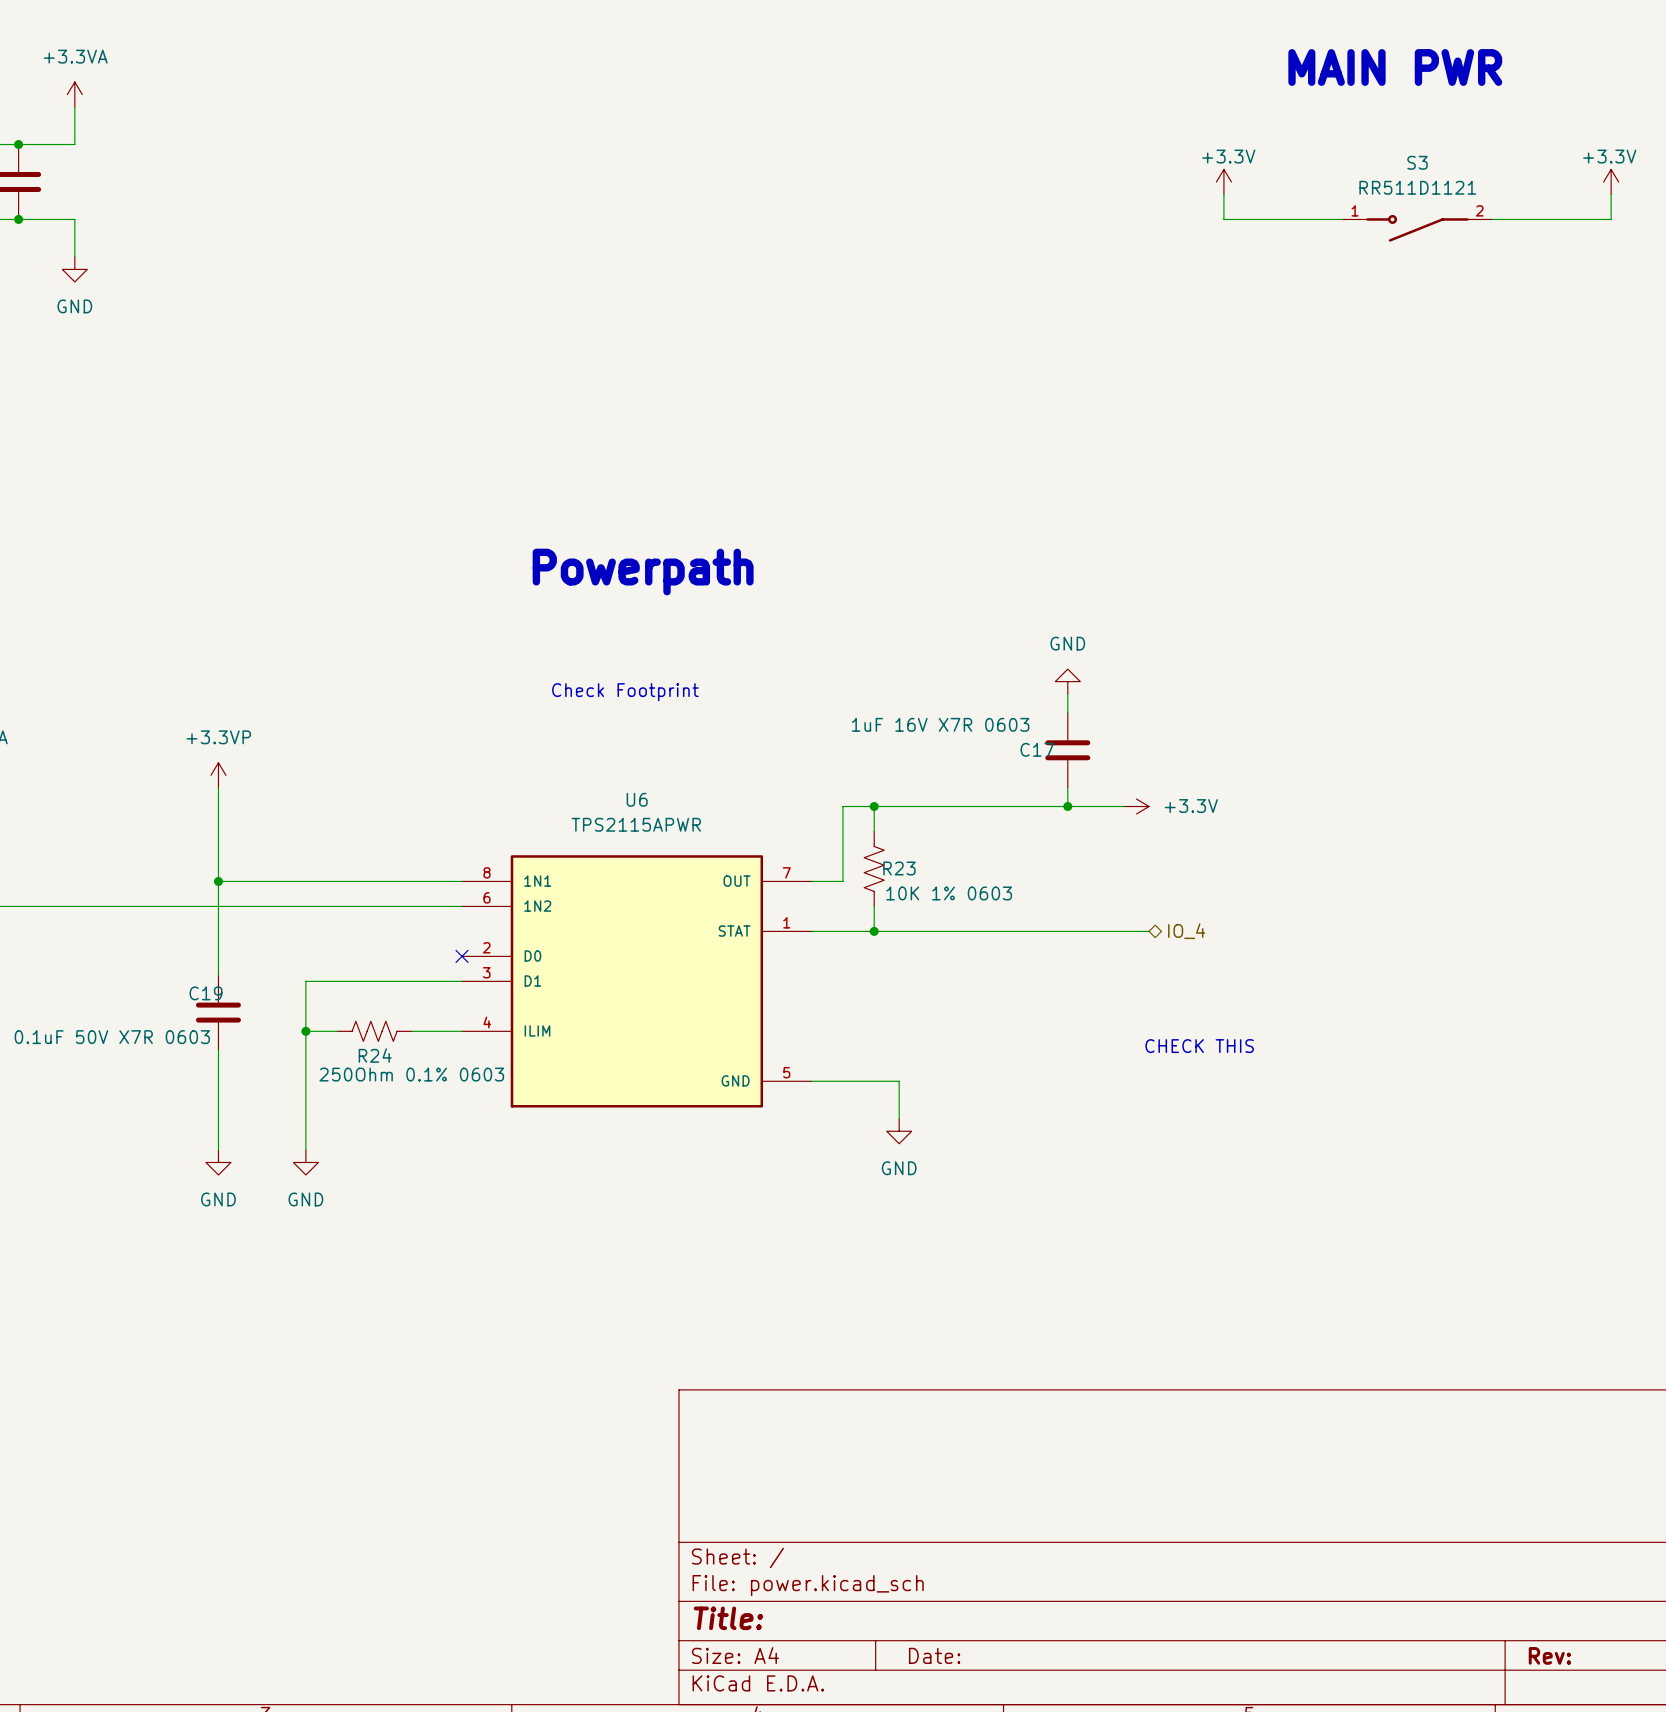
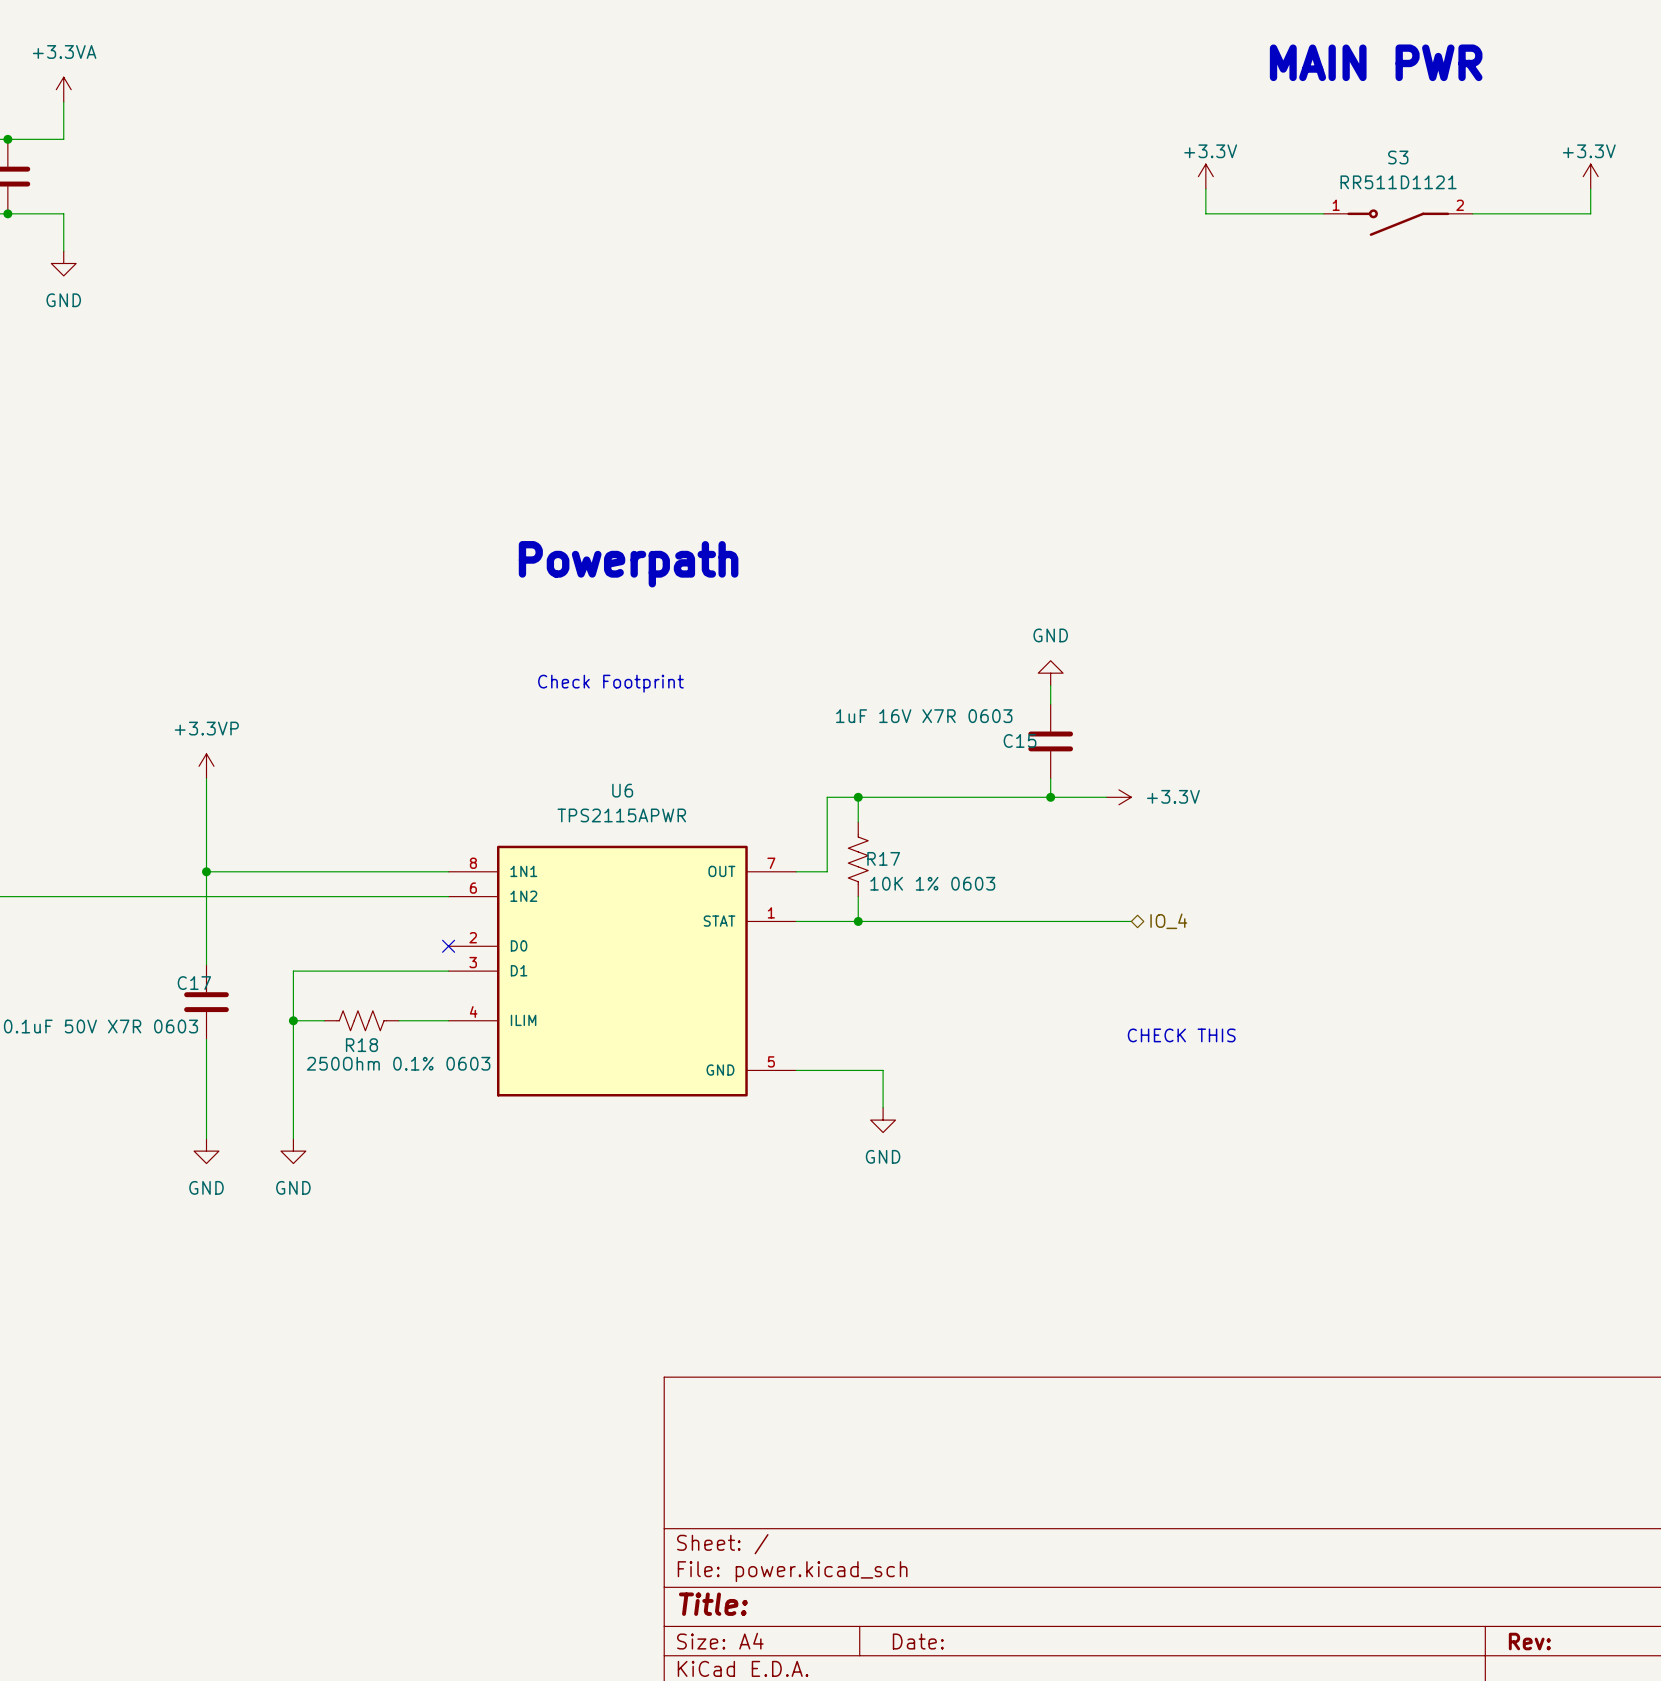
C17 name: C17 (1037, 749) -> C15 (1020, 740)
R23 name: R23 (899, 868) -> R17 (883, 858)
C19 name: C19 (205, 993) -> C17 (194, 983)
R24 name: R24 (375, 1055) -> R18 (361, 1045)

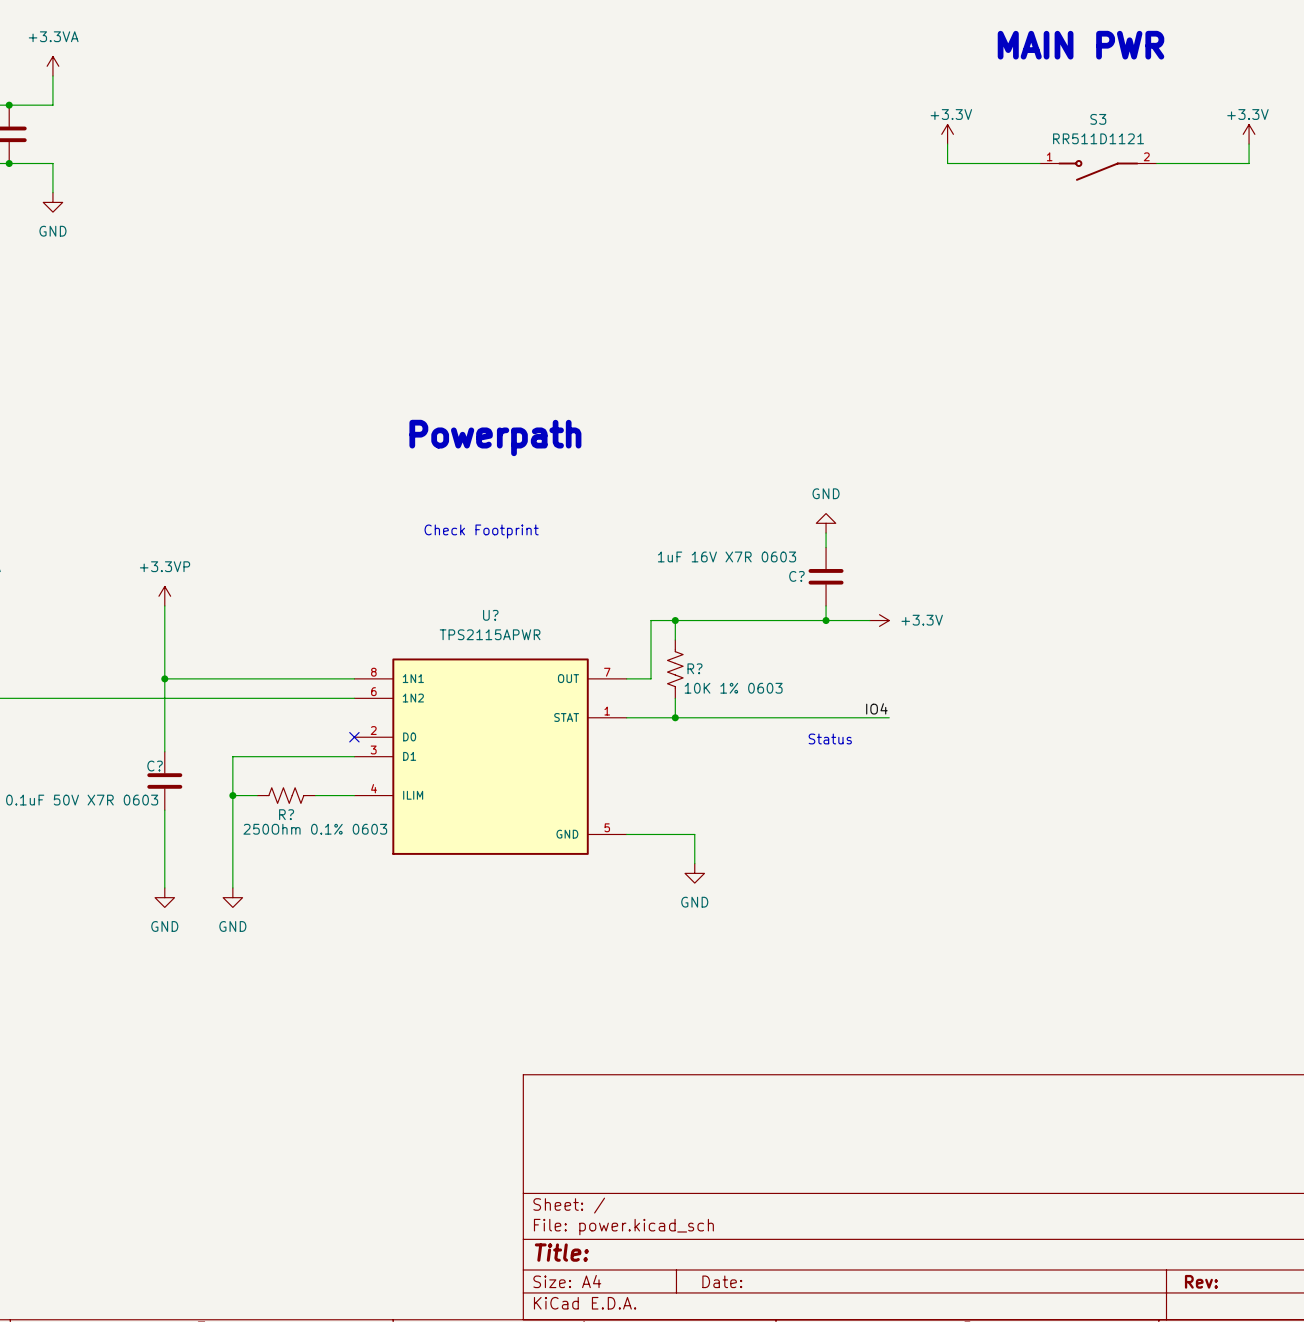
C15 name: C15 (1020, 740) -> C? (796, 576)
U6 name: U6 (622, 790) -> U? (490, 615)
R17 name: R17 (883, 858) -> R? (694, 668)
label: none -> IO4 (876, 708)
hierarchical label: IO_4 (1168, 921) -> none
text: none -> Status (830, 738)
C17 name: C17 (194, 983) -> C? (155, 766)
text: CHECK THIS (1181, 1035) -> none
R18 name: R18 (361, 1045) -> R? (286, 814)

